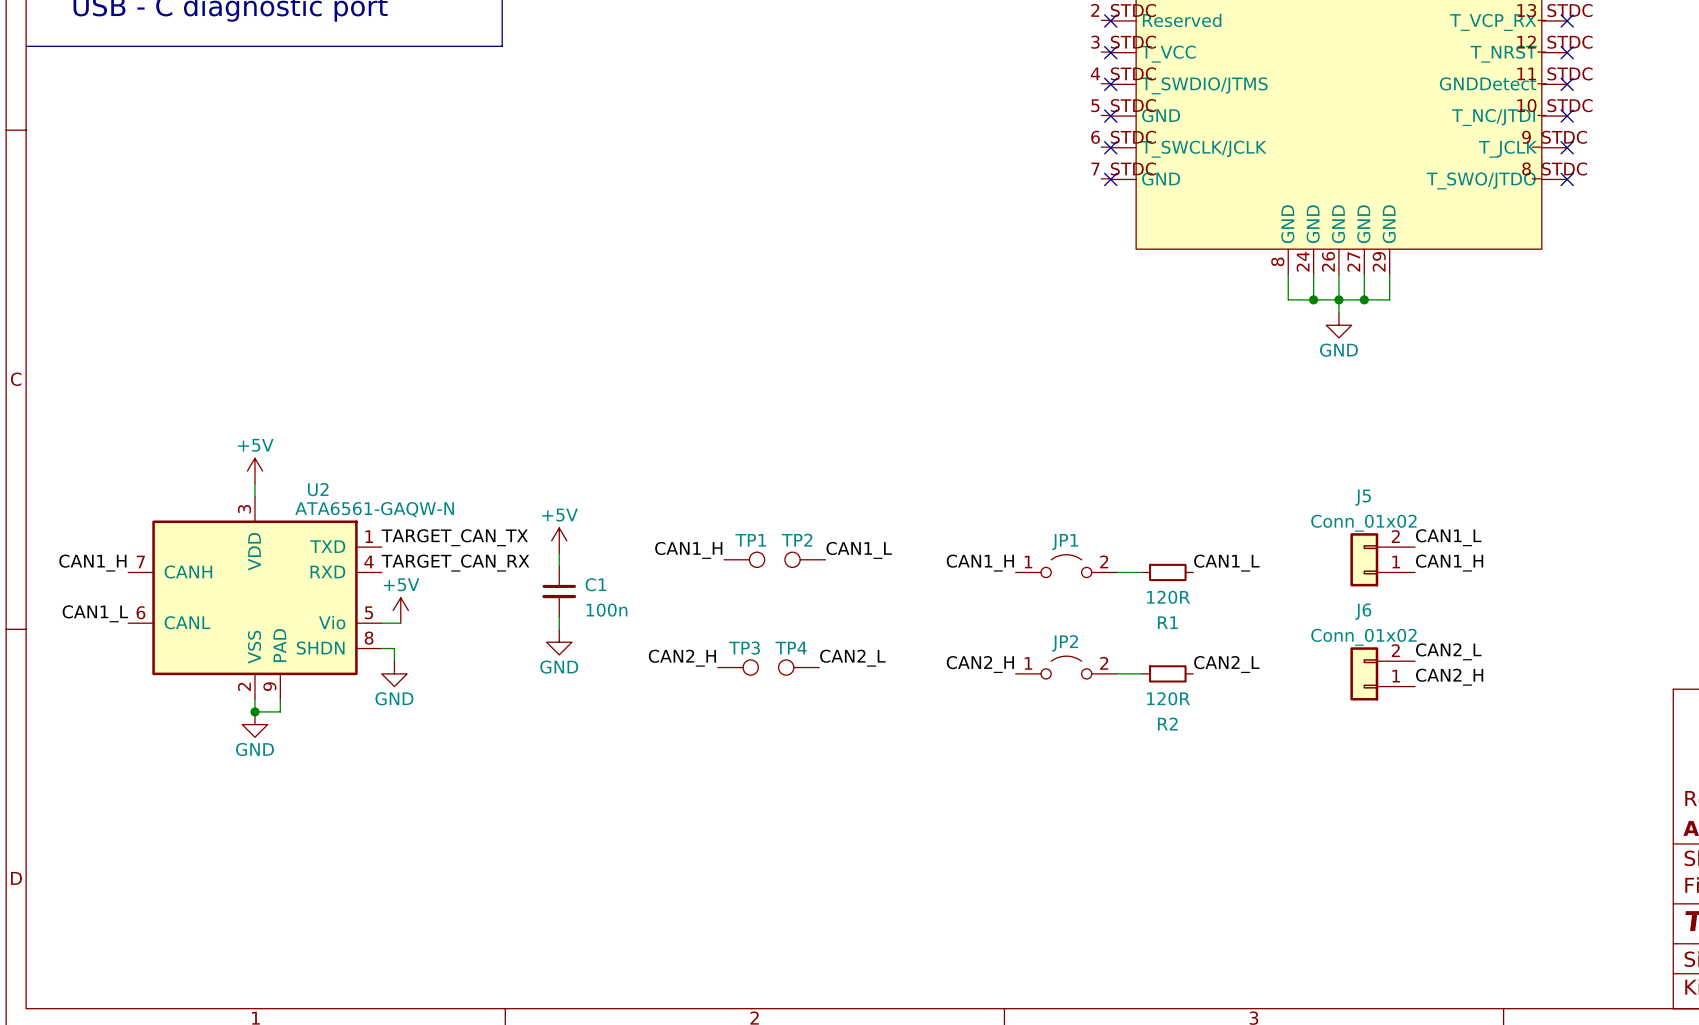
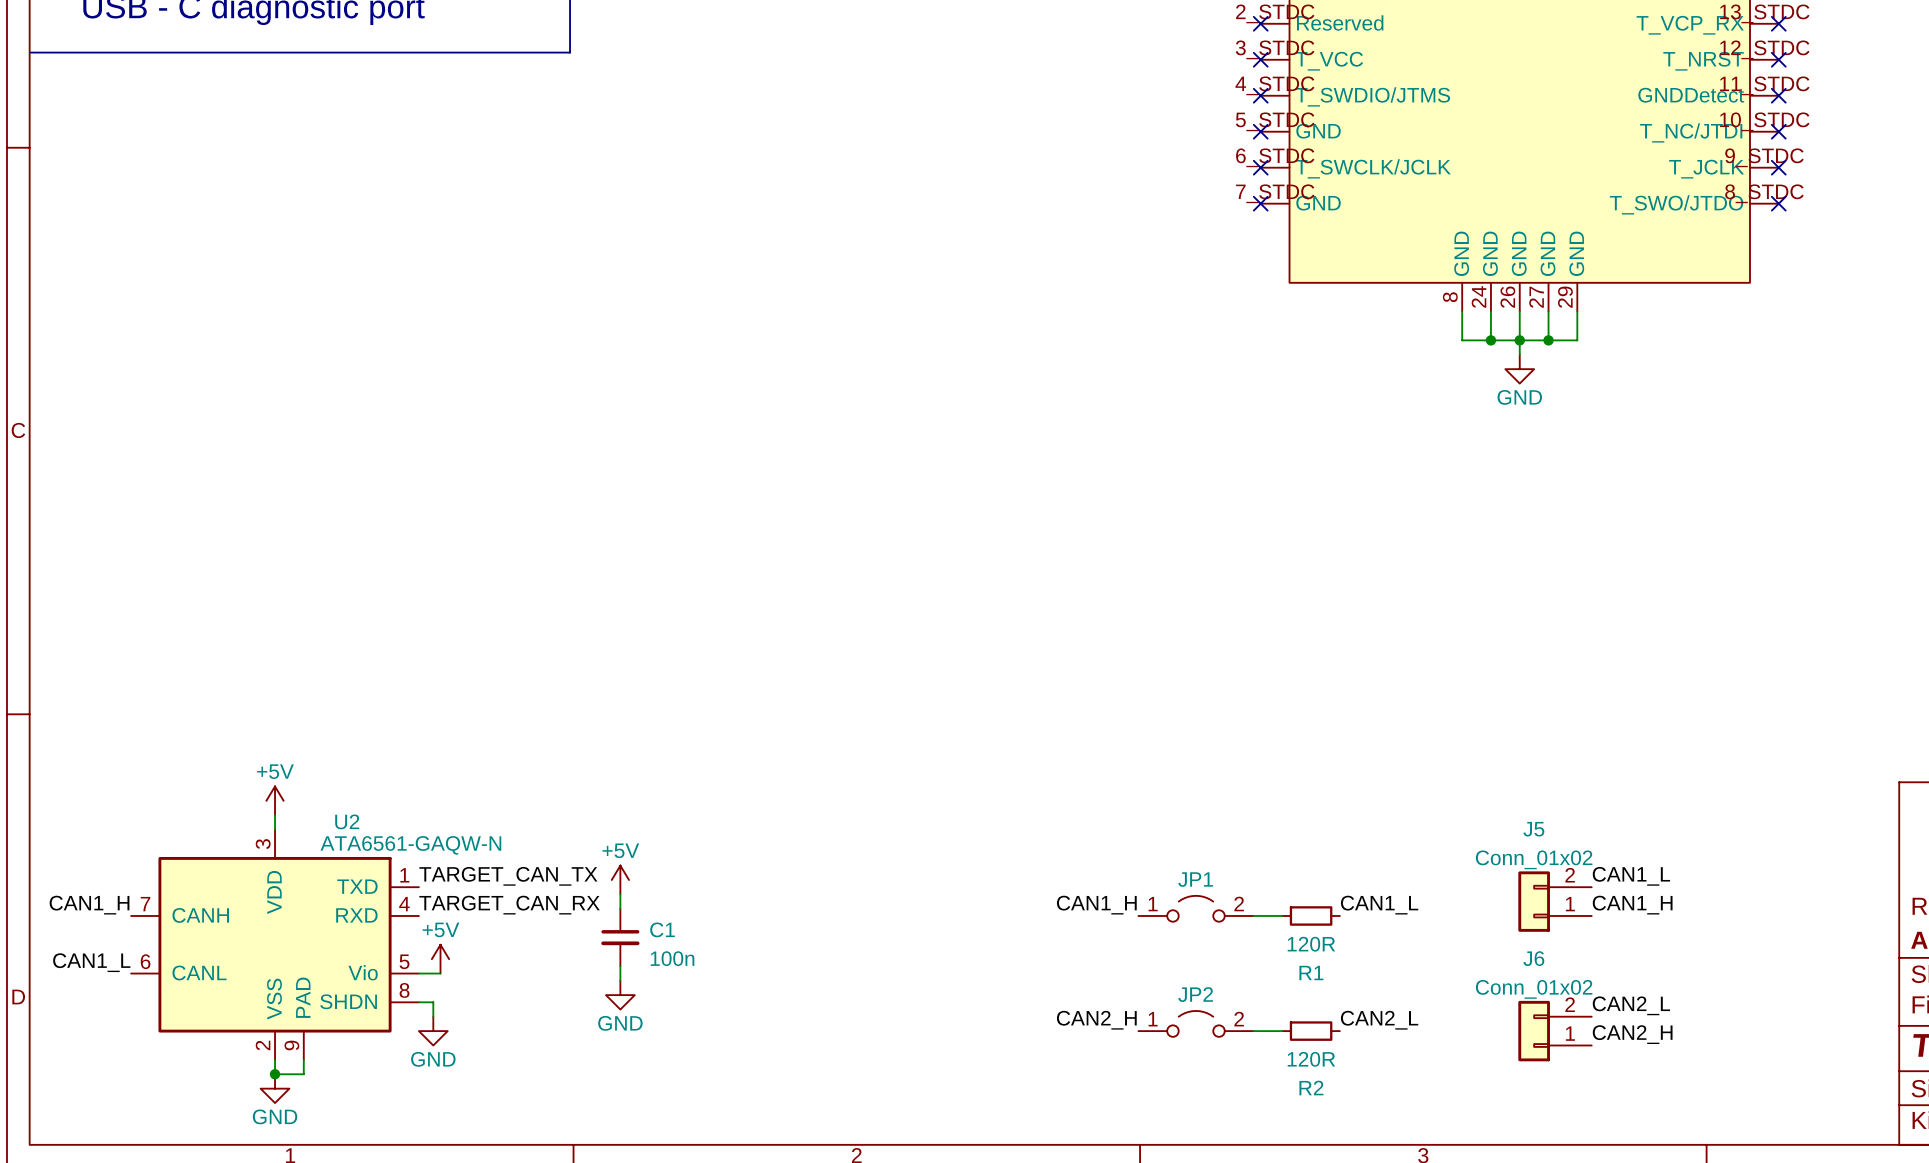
power symbol: +5V (254, 471) -> none
wire: (254, 483) (254, 496) -> (275, 815) (275, 829)
label position: TARGET_CAN_TX (454, 537) -> TARGET_CAN_TX (508, 876)
label: CAN1_L (1448, 537) -> none
power symbol: +5V (559, 540) -> none
label: CAN1_H (688, 550) -> none
label: CAN1_L (859, 550) -> none
wire: (559, 553) (559, 566) -> (620, 894) (620, 908)
TP1: (744, 559) -> none
TP2: (805, 559) -> none
J5 position: (1382, 559) -> (1555, 901)
label position: CAN1_H (92, 563) -> CAN1_H (89, 905)
label position: TARGET_CAN_RX (455, 563) -> TARGET_CAN_RX (509, 905)
label: CAN1_H (980, 563) -> none
label: CAN1_L (1226, 563) -> none
label: CAN1_H (1449, 563) -> none
JP1 position: (1066, 566) -> (1195, 908)
wire: (1117, 572) (1142, 572) -> (1253, 915) (1282, 915)
R1 position: (1167, 572) -> (1311, 915)
C1 position: (559, 591) -> (620, 937)
U2 position: (254, 597) -> (275, 944)
power symbol: +5V (400, 610) -> none
label position: CAN1_L (95, 613) -> CAN1_L (91, 962)
wire: (559, 616) (559, 629) -> (620, 966) (620, 980)
wire: (381, 623) (400, 623) -> (418, 973) (440, 973)
power symbol: GND (559, 642) -> none
wire: (381, 648) (394, 648) (394, 661) -> (418, 1002) (433, 1002) (433, 1016)
label: CAN2_L (1448, 651) -> none
label: CAN2_H (682, 658) -> none
label: CAN2_L (852, 658) -> none
label: CAN2_H (980, 664) -> none
label: CAN2_L (1226, 664) -> none
TP3: (738, 667) -> none
TP4: (798, 667) -> none
JP2 position: (1066, 667) -> (1195, 1023)
power symbol: GND (394, 673) -> none
wire: (1117, 673) (1142, 673) -> (1253, 1031) (1282, 1031)
R2 position: (1167, 673) -> (1311, 1031)
J6 position: (1382, 673) -> (1555, 1031)
label: CAN2_H (1449, 677) -> none
wire: (254, 699) (254, 711) (280, 711) (280, 699) -> (275, 1059) (275, 1074) (303, 1074) (303, 1059)
power symbol: none -> +5V (275, 800)
junction: (254, 711) -> none
power symbol: GND (254, 724) -> none
label: none -> CAN1_L (1631, 876)
power symbol: none -> +5V (620, 880)
label: none -> CAN1_H (1096, 905)
label: none -> CAN1_L (1379, 905)
label: none -> CAN1_H (1632, 905)
power symbol: none -> +5V (440, 959)
power symbol: none -> GND (620, 995)
label: none -> CAN2_L (1631, 1005)
label: none -> CAN2_H (1096, 1020)
label: none -> CAN2_L (1379, 1020)
power symbol: none -> GND (433, 1031)
label: none -> CAN2_H (1632, 1034)
junction: none -> (275, 1074)
power symbol: none -> GND (275, 1088)

